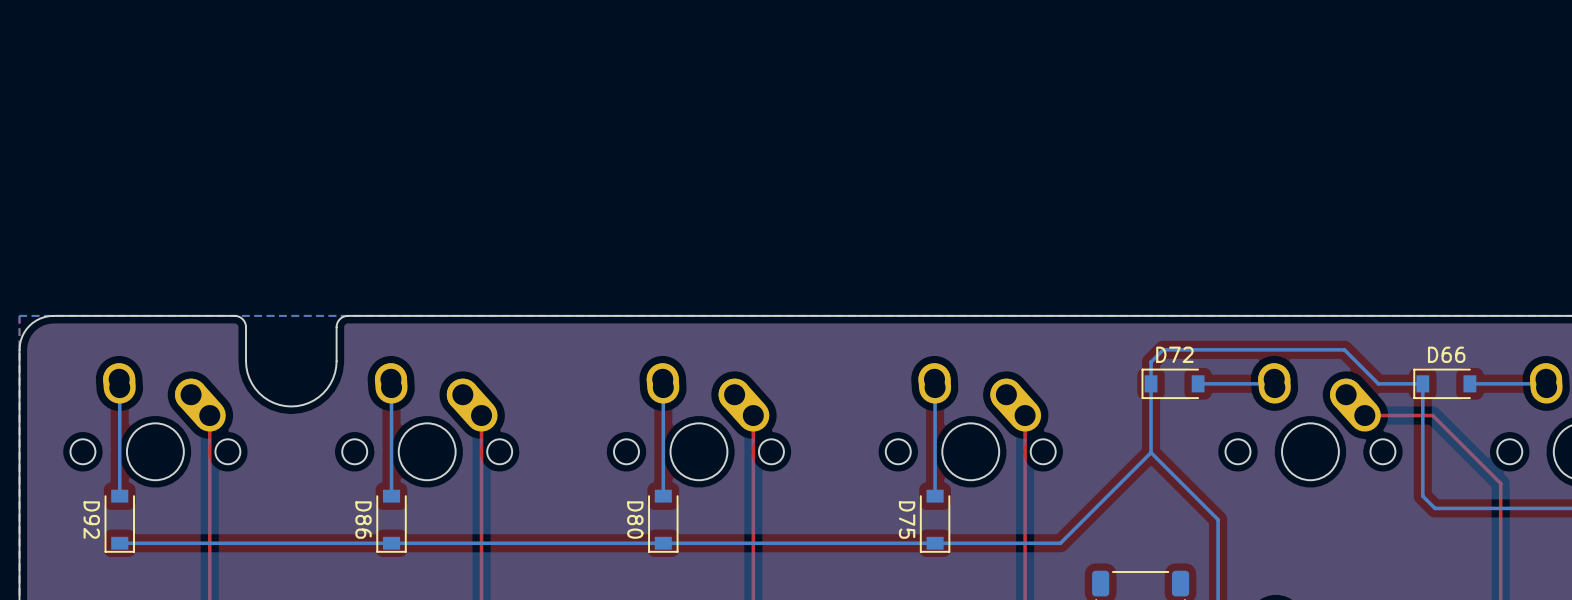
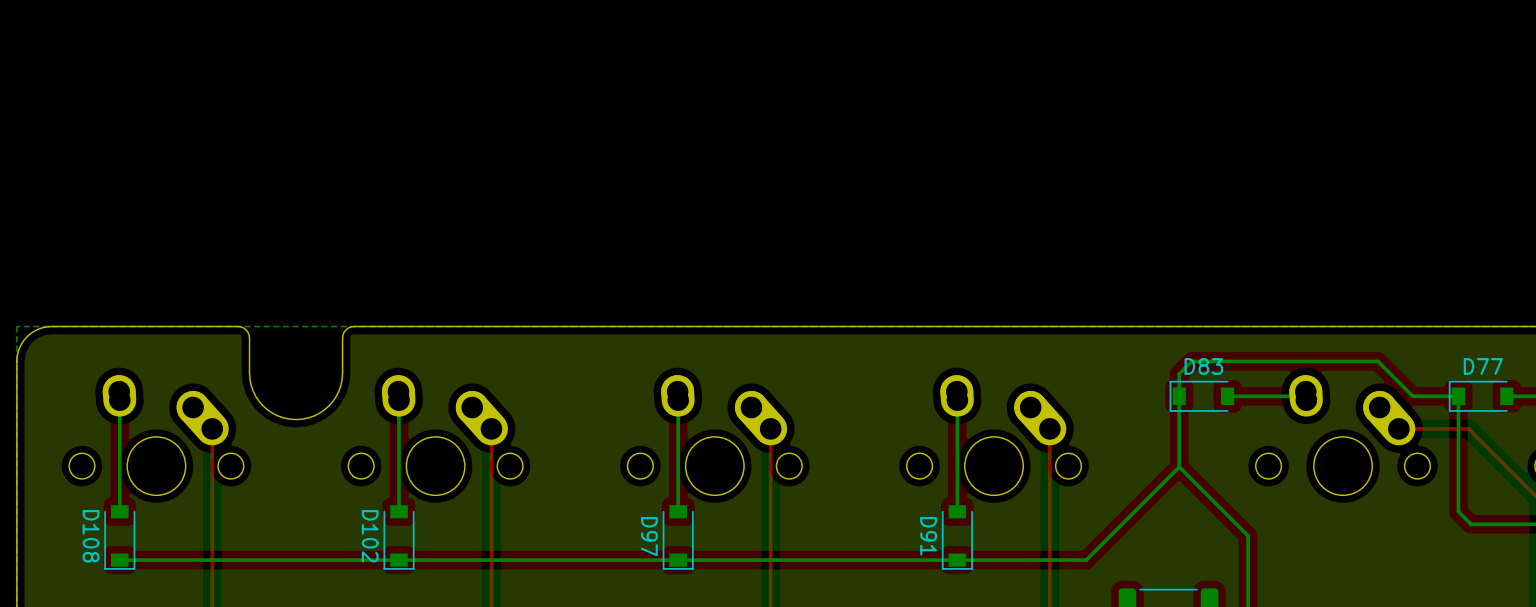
D72 name: D72 (1174, 354) -> D83 (1203, 366)
D66 name: D66 (1446, 354) -> D77 (1483, 366)
D92 name: D92 (91, 520) -> D108 (91, 536)
D86 name: D86 (363, 520) -> D102 (370, 536)
D80 name: D80 (635, 520) -> D97 (649, 536)
D75 name: D75 (907, 520) -> D91 (928, 536)

